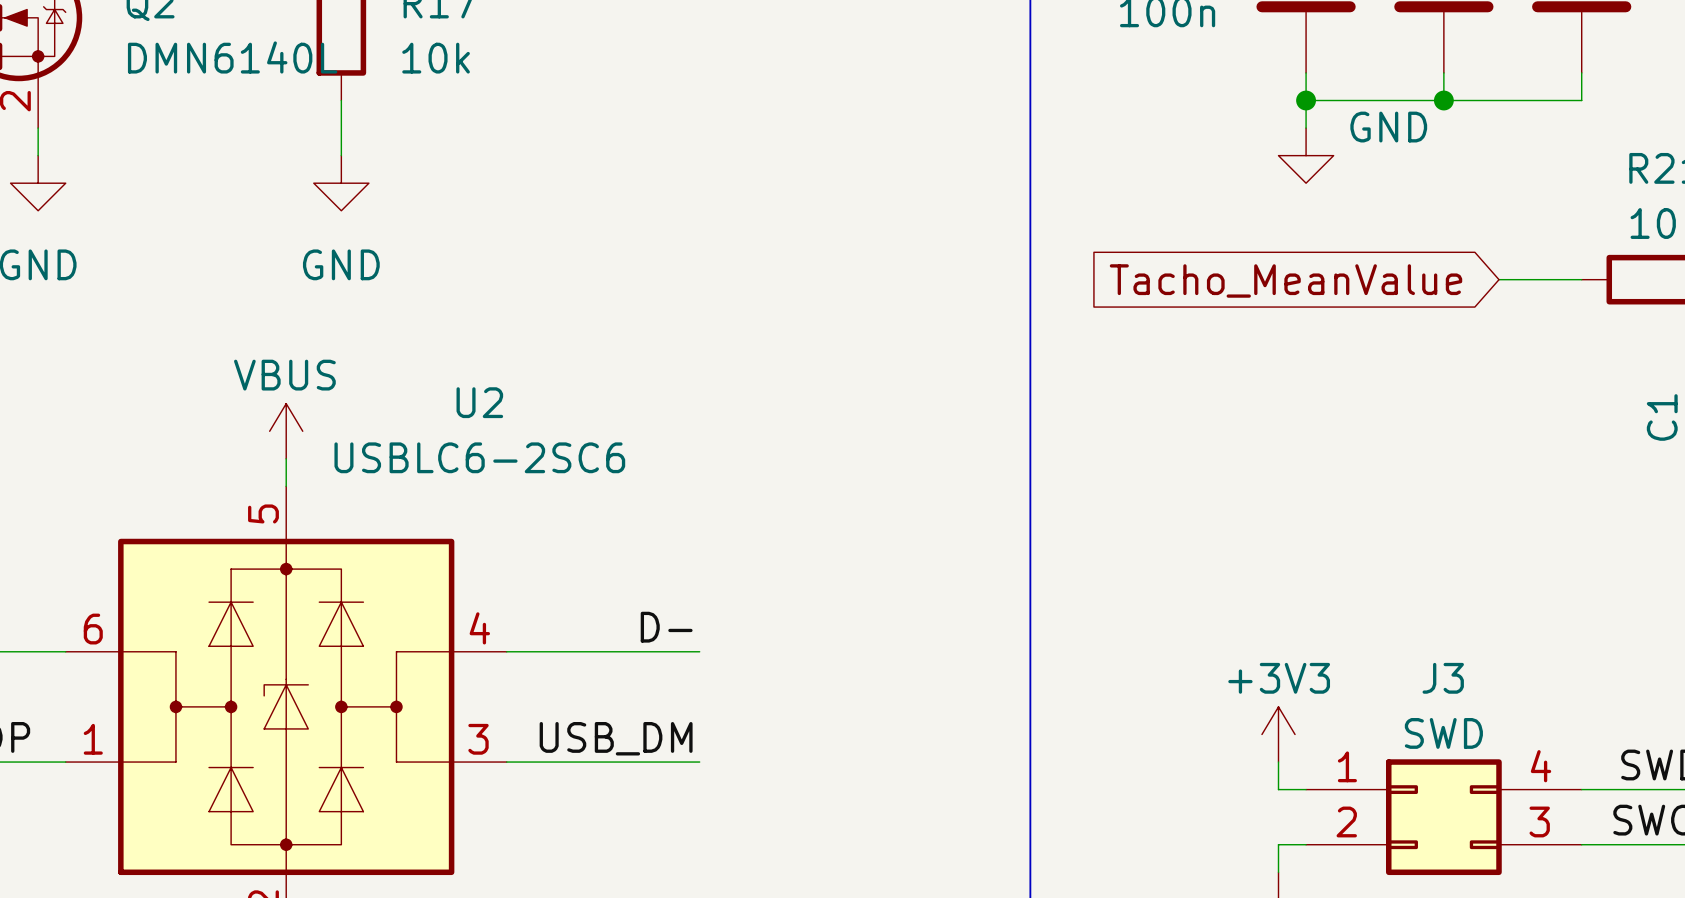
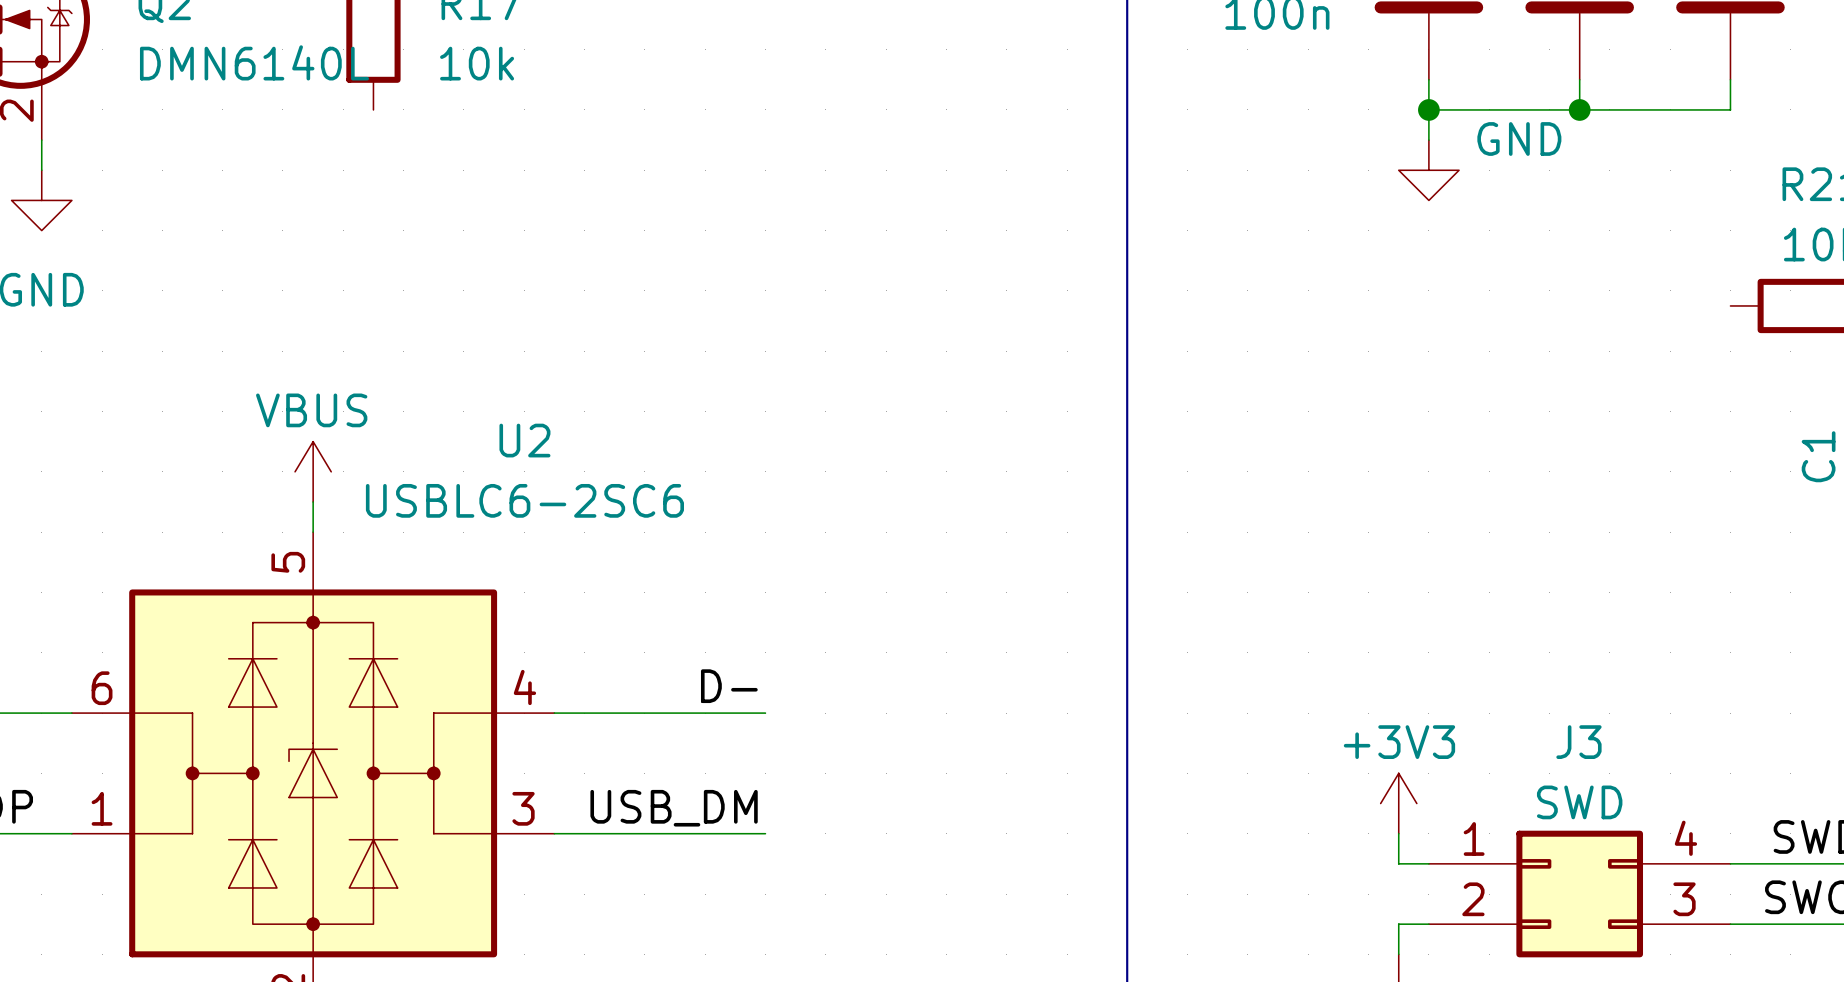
wire: (341, 100) (341, 155) -> none
power symbol: GND (341, 183) -> none
wire: (1499, 279) (1581, 279) -> none
global label: Tacho_MeanValue (1286, 280) -> none

